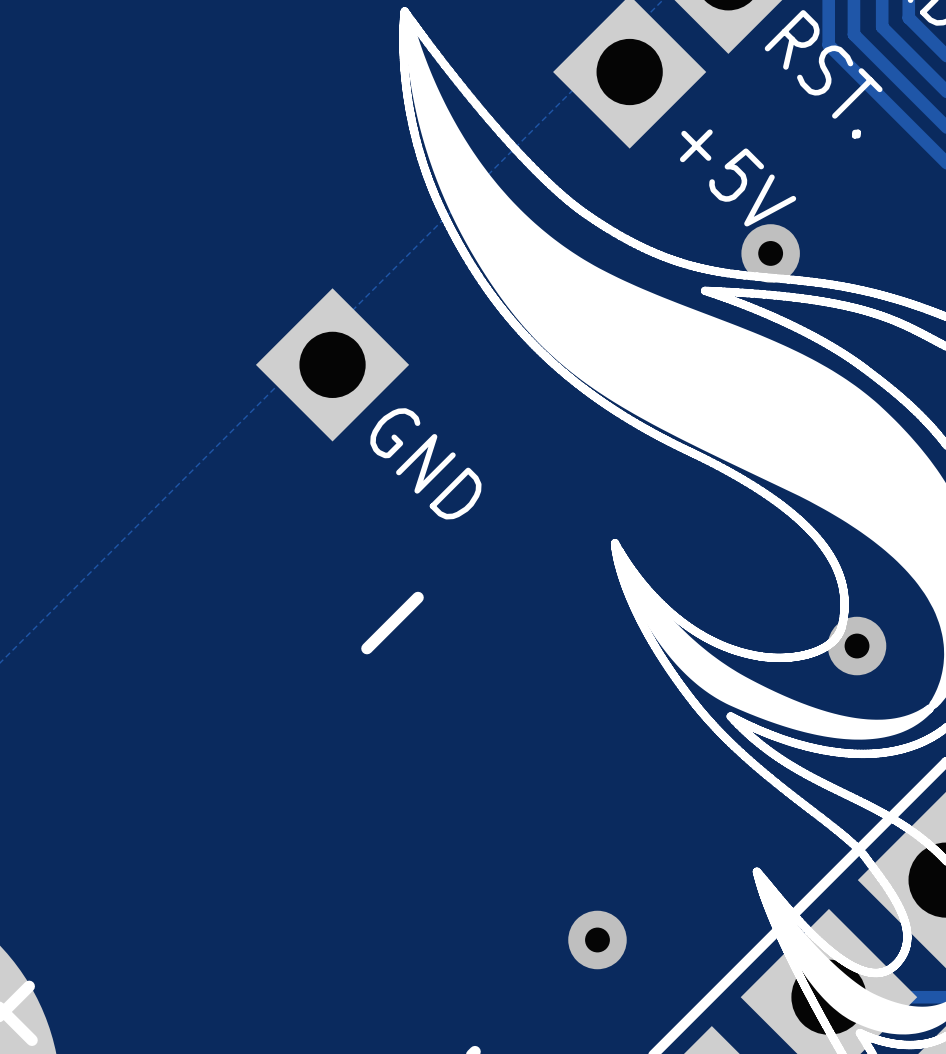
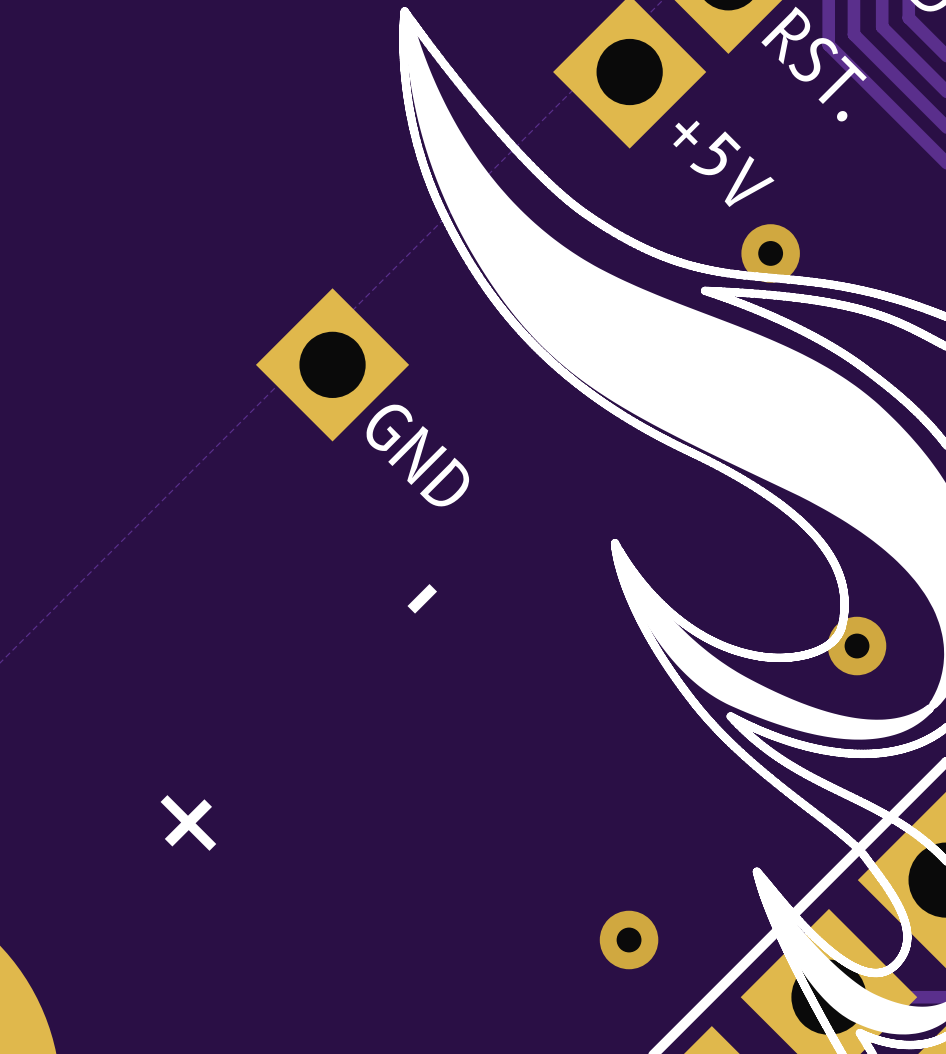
via position: (597, 939) -> (629, 939)

